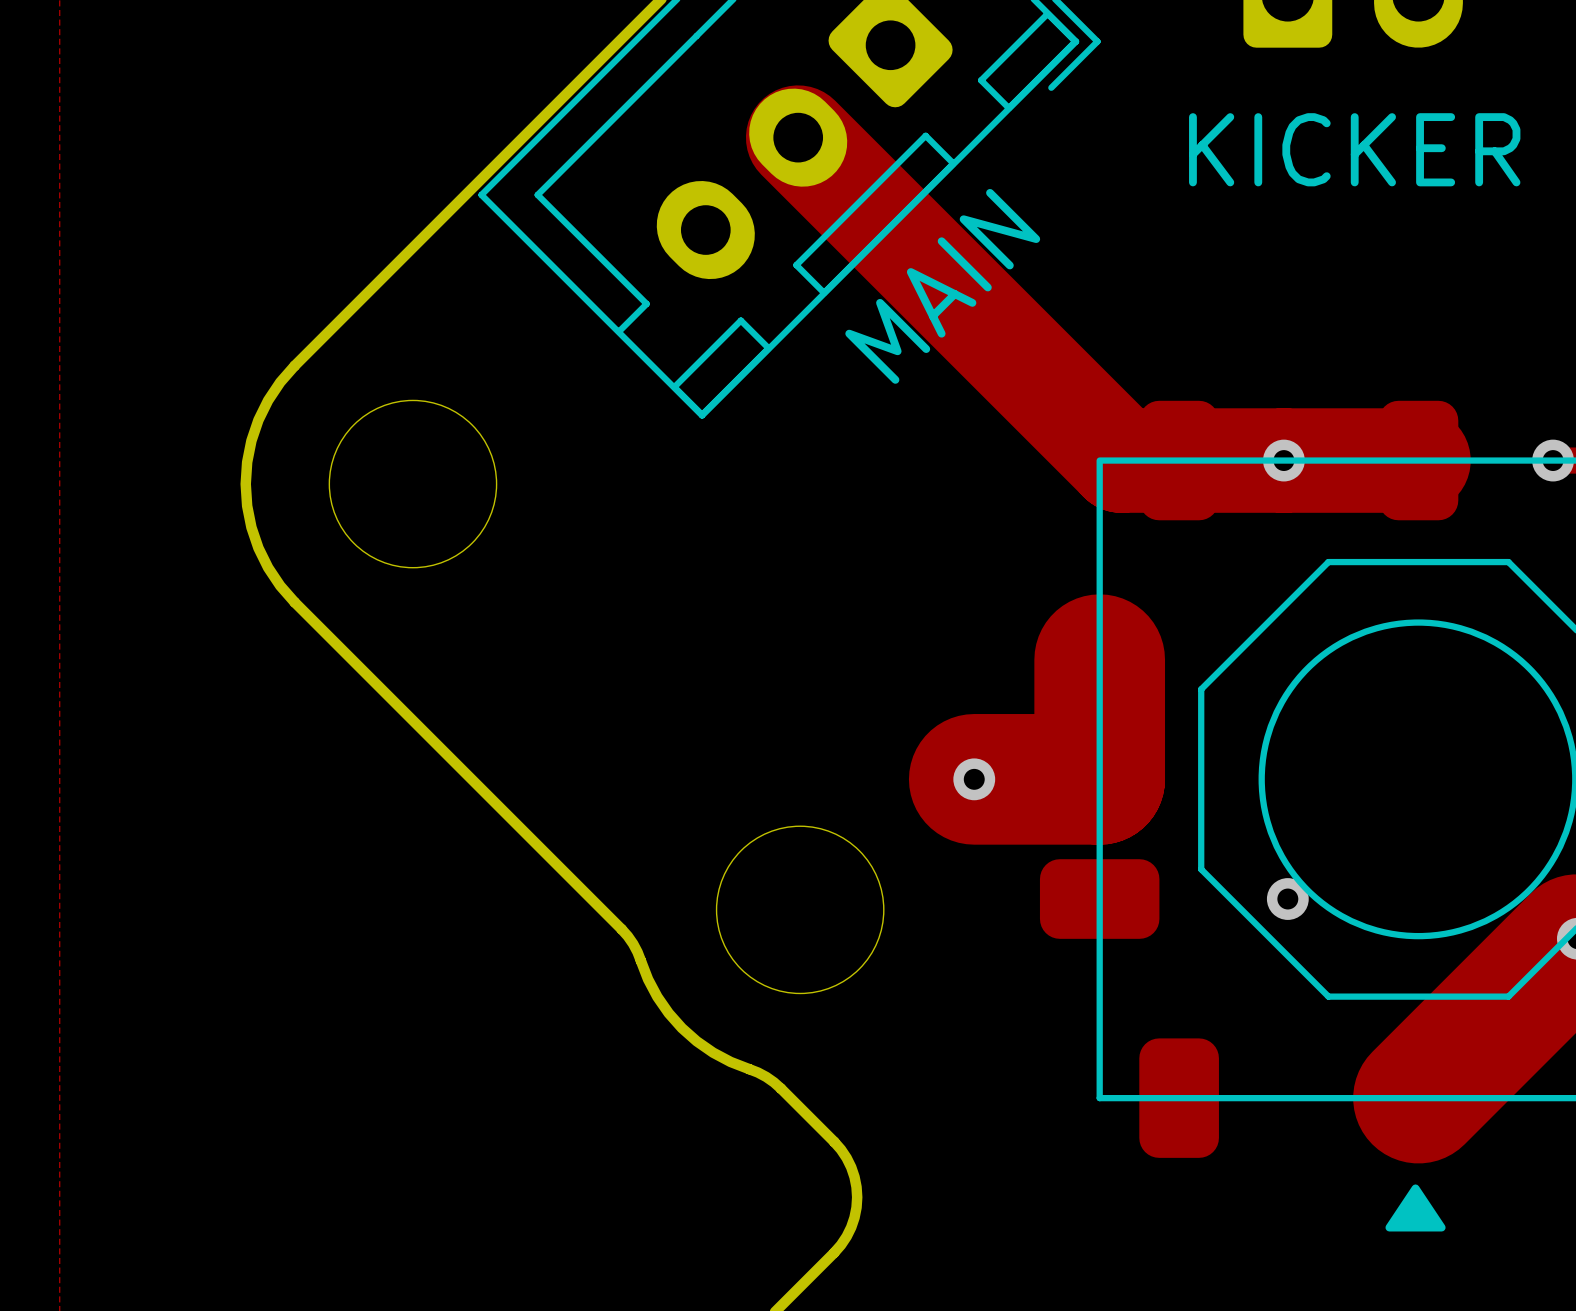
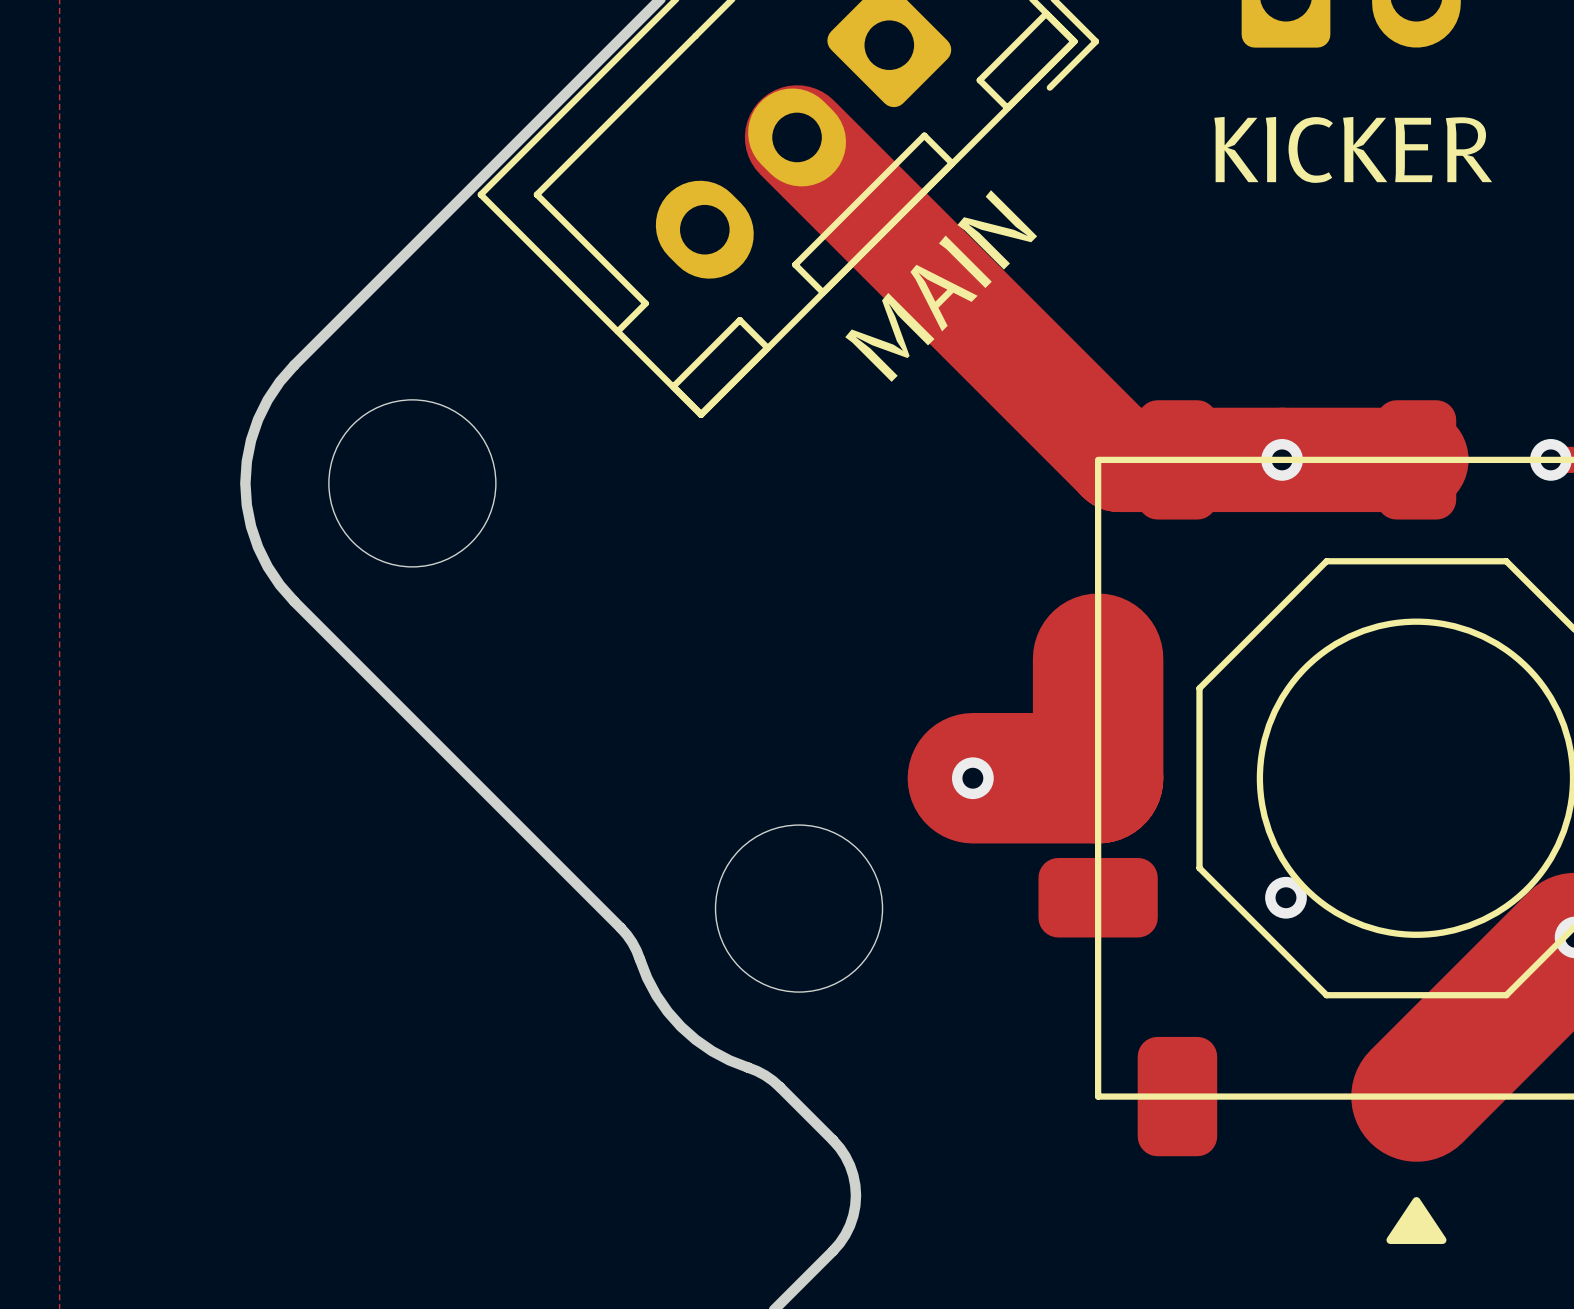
drawing position: (1415, 1207) -> (1416, 1220)

